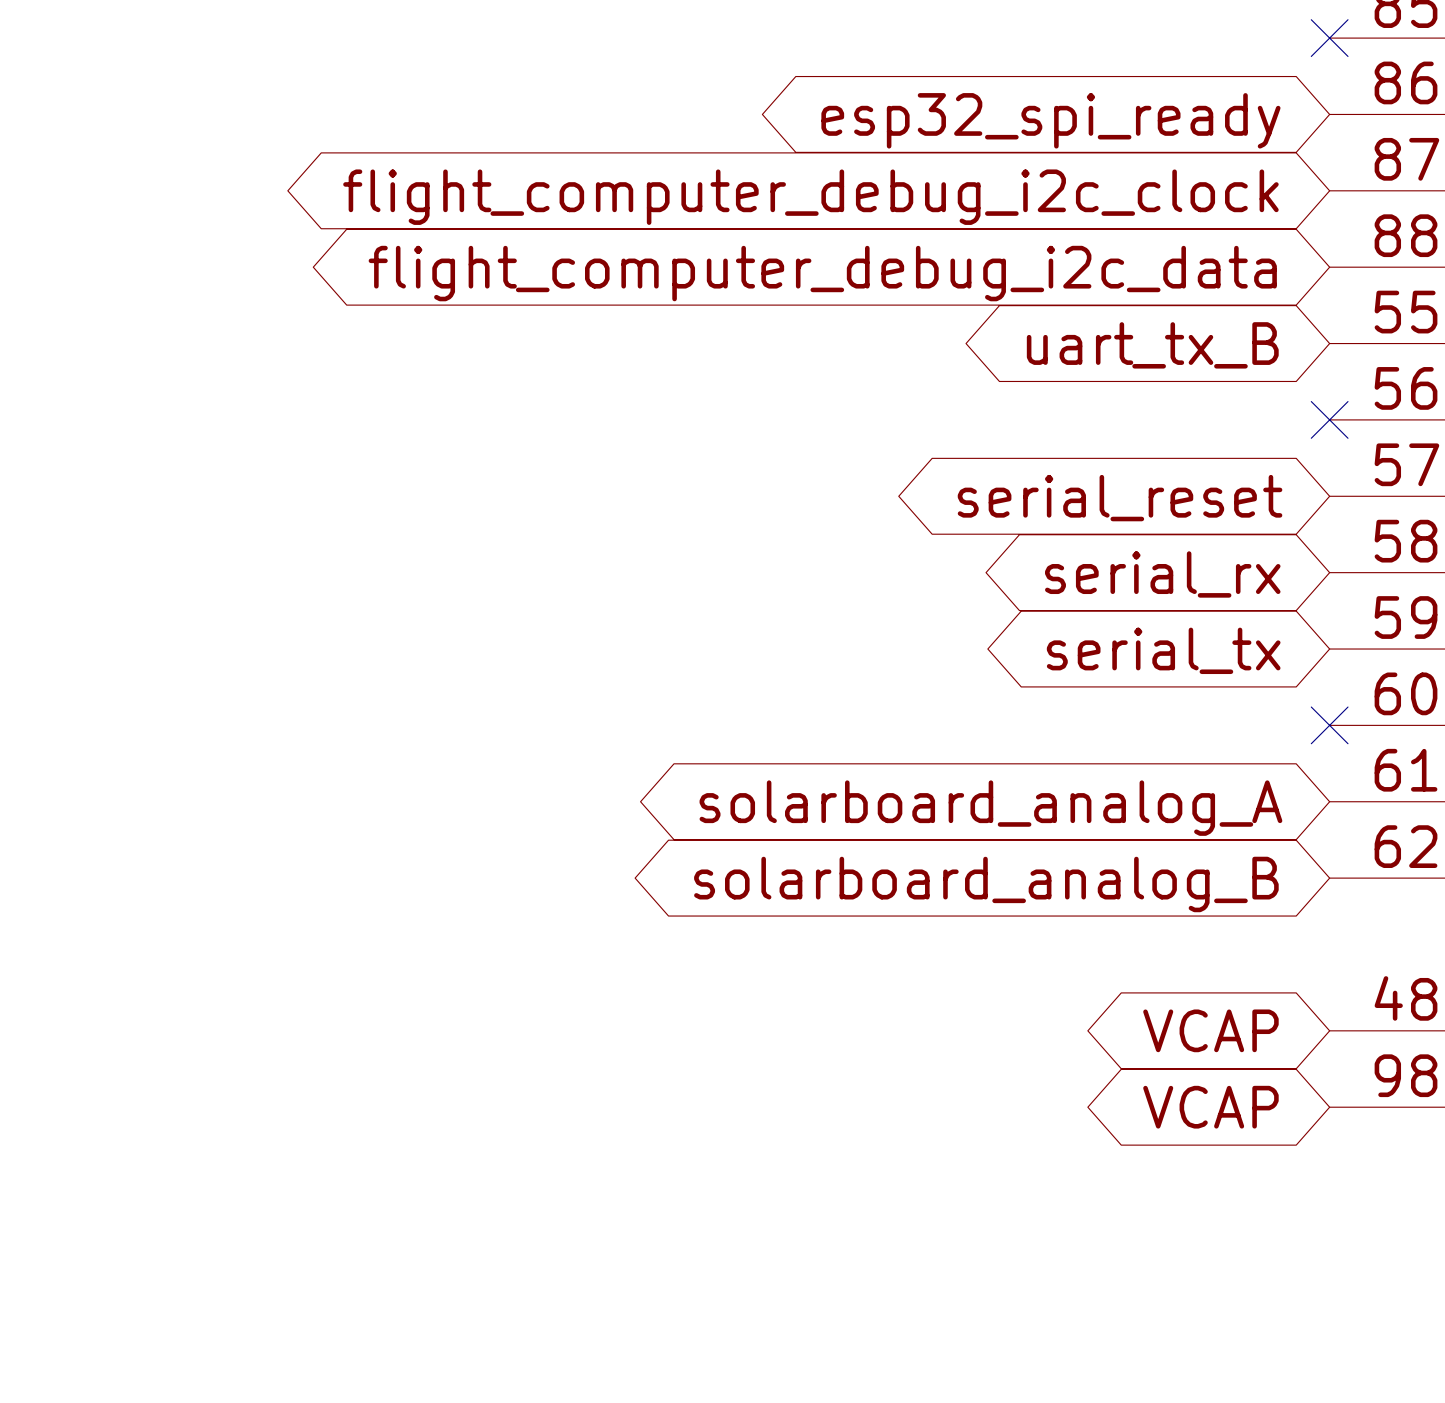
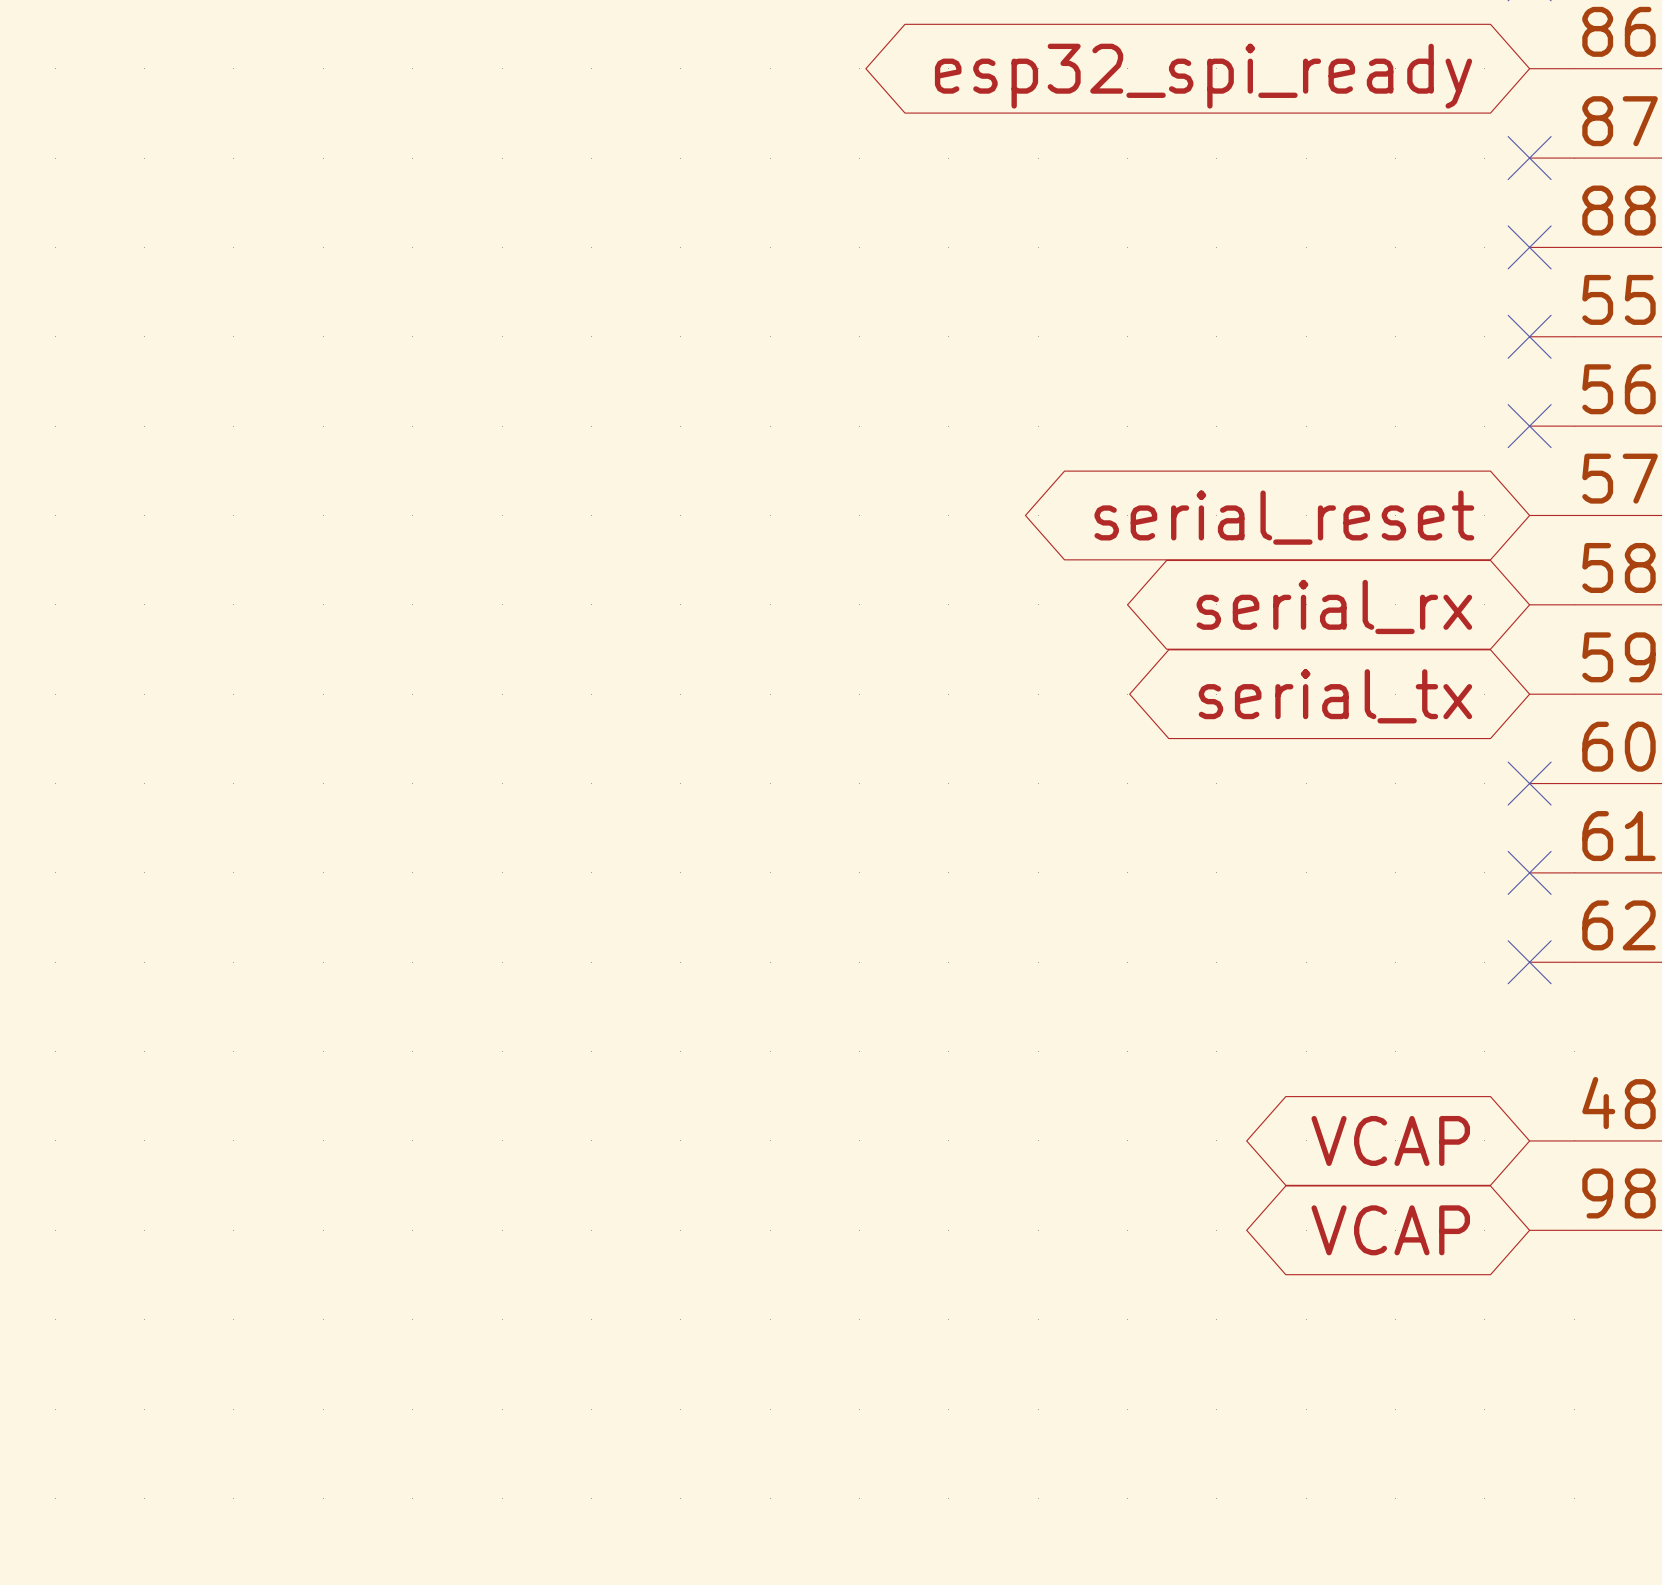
no-connect mark: none -> (1529, 158)
global label: flight_computer_debug_i2c_clock (810, 197) -> none
no-connect mark: none -> (1529, 247)
global label: flight_computer_debug_i2c_data (822, 273) -> none
no-connect mark: none -> (1529, 336)
global label: uart_tx_B (1152, 345) -> none
no-connect mark: none -> (1529, 872)
global label: solarboard_analog_A (990, 808) -> none
no-connect mark: none -> (1529, 962)
global label: solarboard_analog_B (986, 884) -> none

